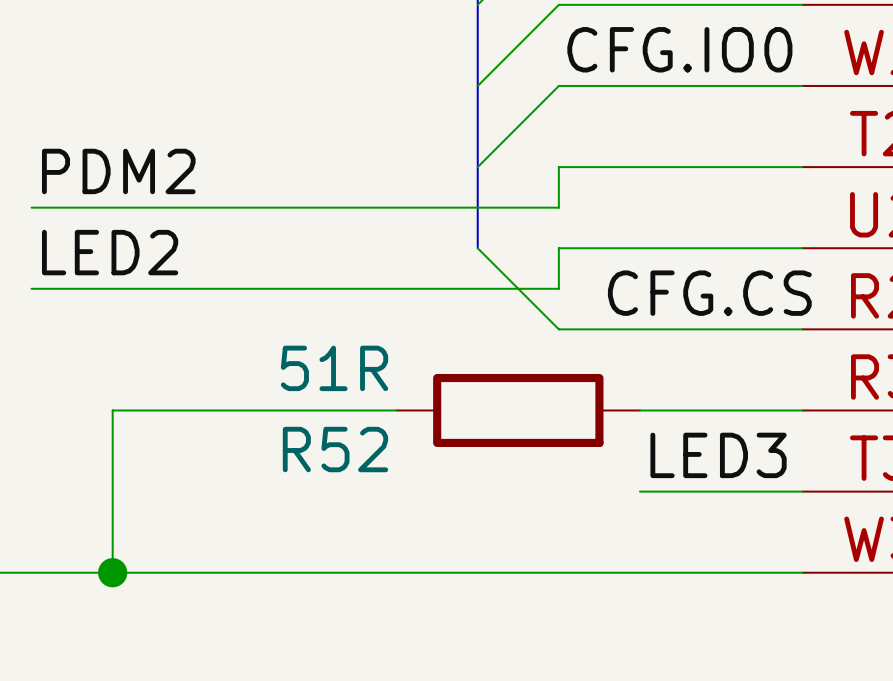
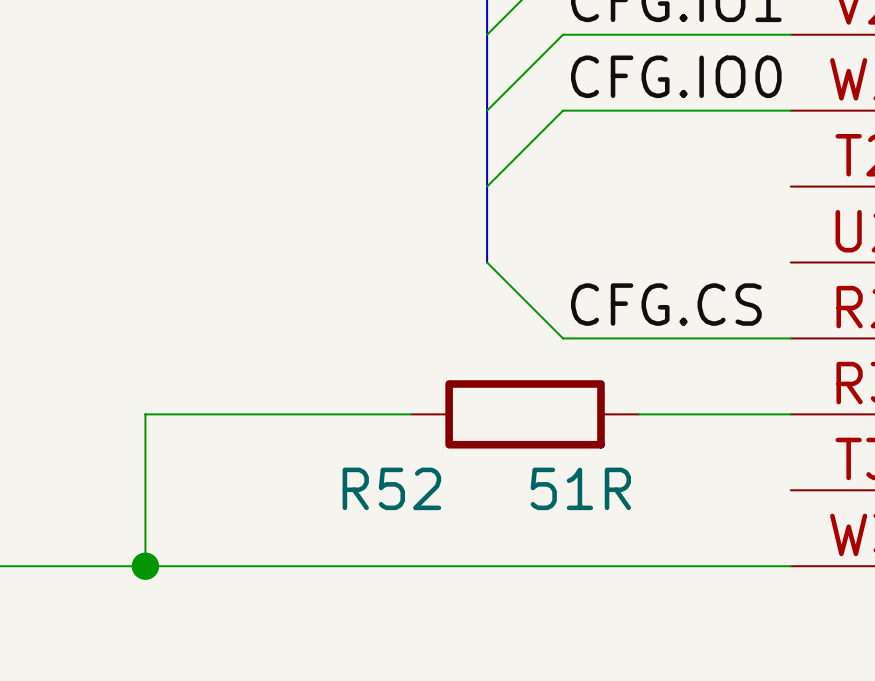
wire: (802, 167) (558, 167) (558, 207) (31, 207) -> none
label: PDM2 (118, 171) -> none
wire: (802, 248) (558, 248) (558, 288) (31, 288) -> none
label: LED2 (110, 252) -> none
label position: CFG.CS (709, 293) -> CFG.CS (666, 304)
R52 value position: 51R (334, 368) -> 51R (580, 488)
R52 name position: R52 (335, 449) -> R52 (391, 488)
label: LED3 (718, 455) -> none
wire: (639, 491) (802, 491) -> none

